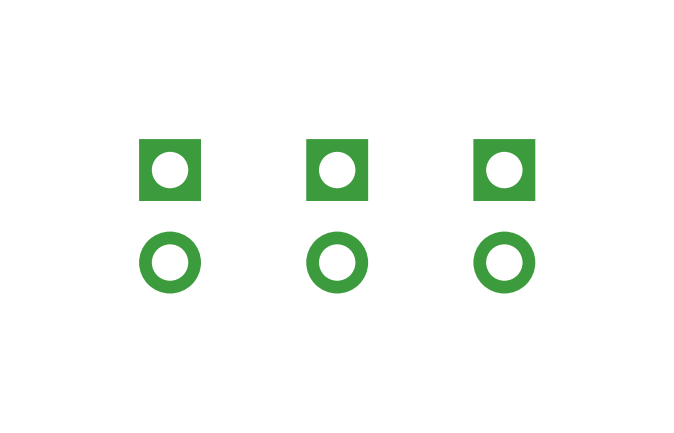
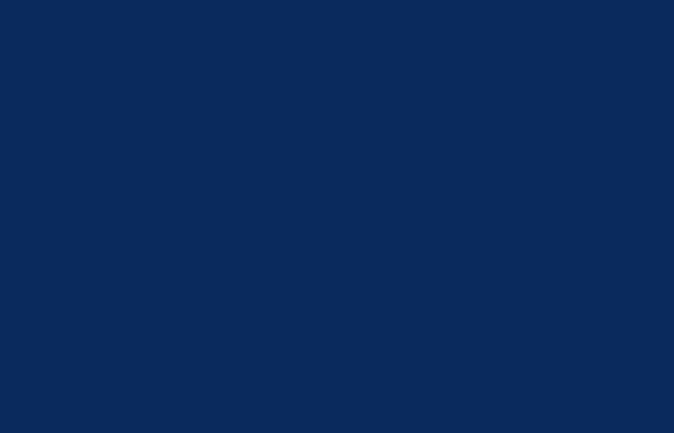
part: (170, 216) -> none
part: (337, 216) -> none
part: (504, 216) -> none

